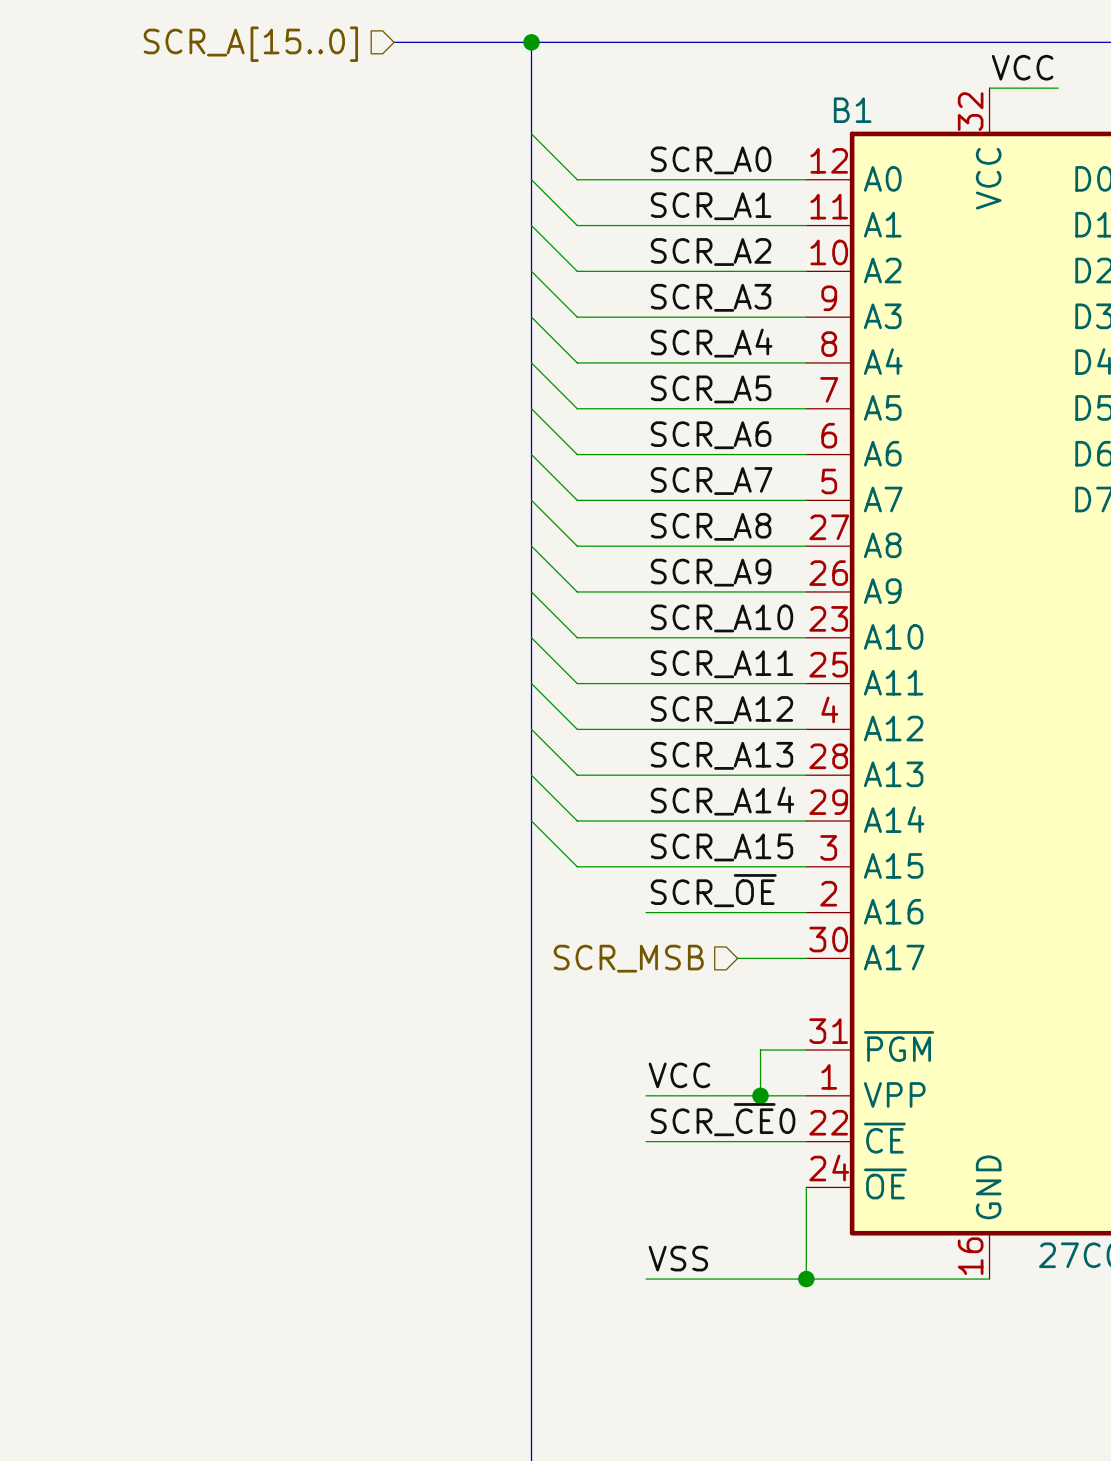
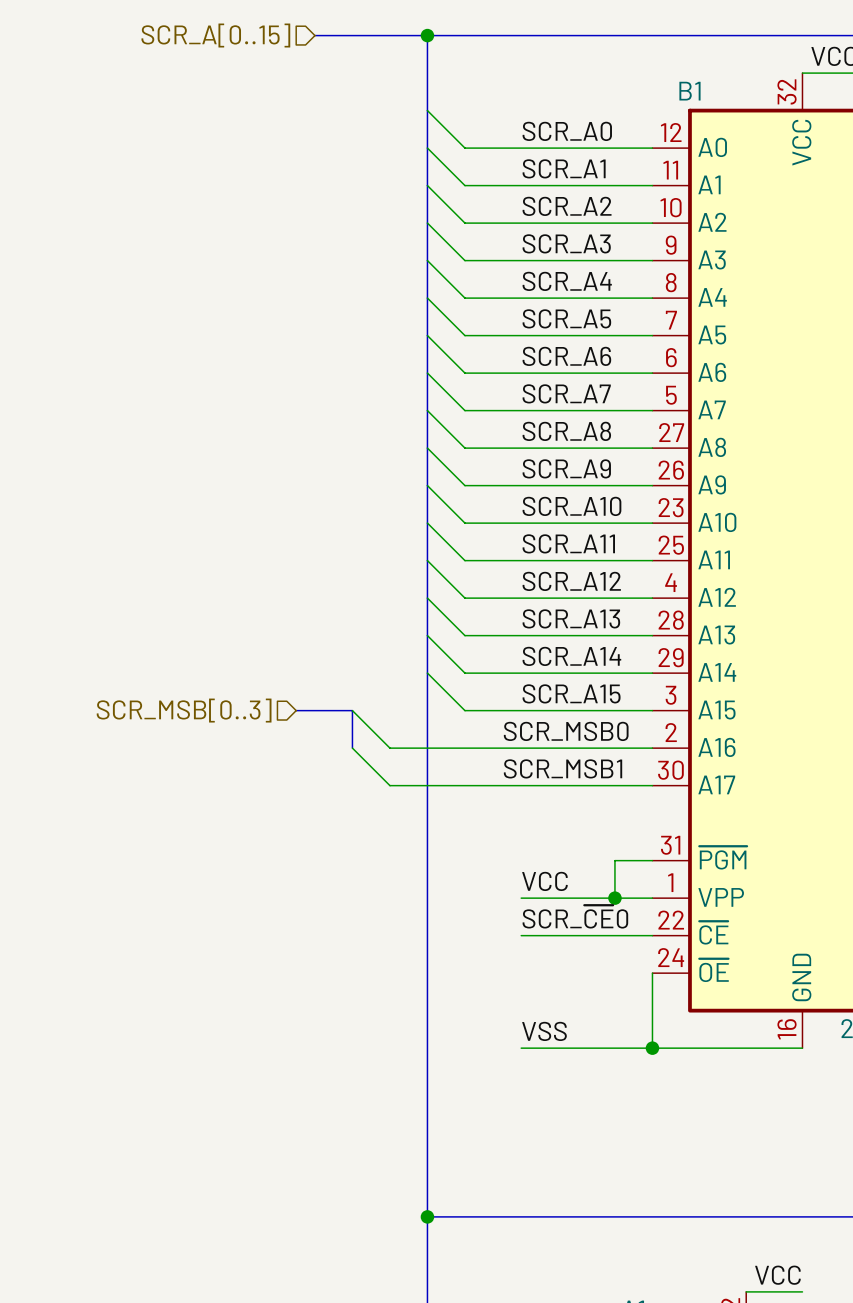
hierarchical label: SCR_A[15..0] (250, 44) -> SCR_A[0..15] (215, 35)
bus: none -> (296, 710) (352, 710) (352, 748)
wire: none -> (352, 710) (389, 748) (521, 748)
hierarchical label: none -> SCR_MSB[0..3] (184, 710)
label: SCR_~{OE} (713, 890) -> none
label: none -> SCR_MSB0 (566, 731)
wire: none -> (352, 748) (389, 785) (596, 785)
label: none -> SCR_MSB1 (563, 768)
hierarchical label: SCR_MSB (628, 958) -> none

